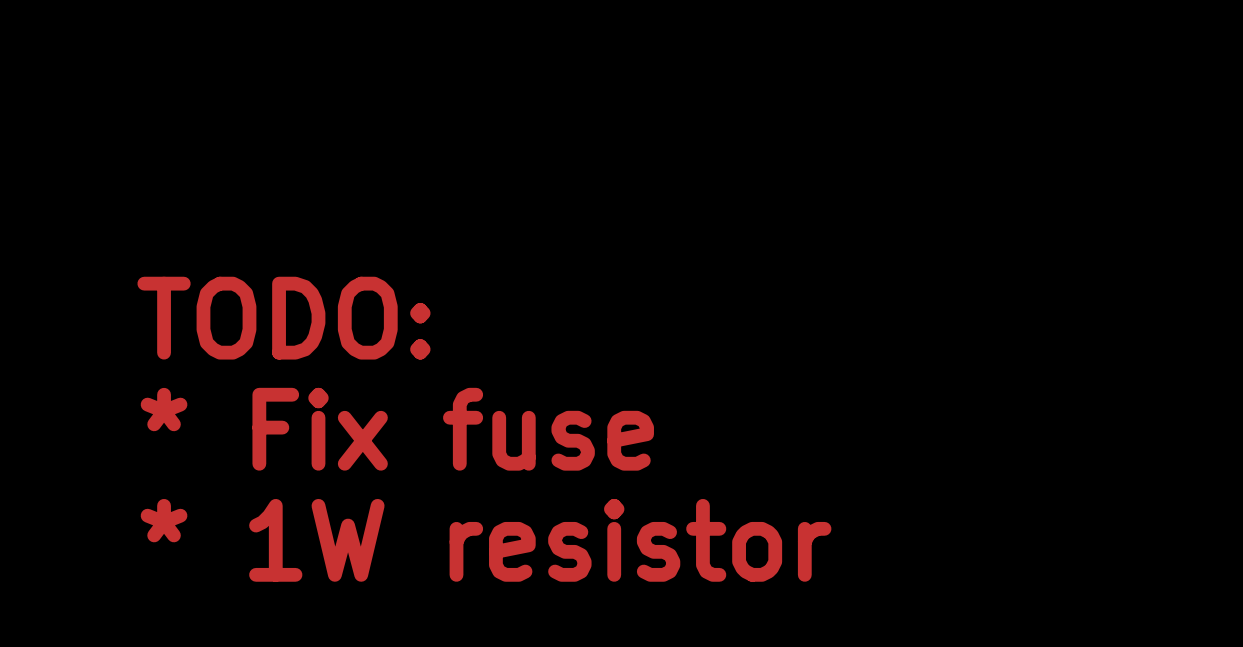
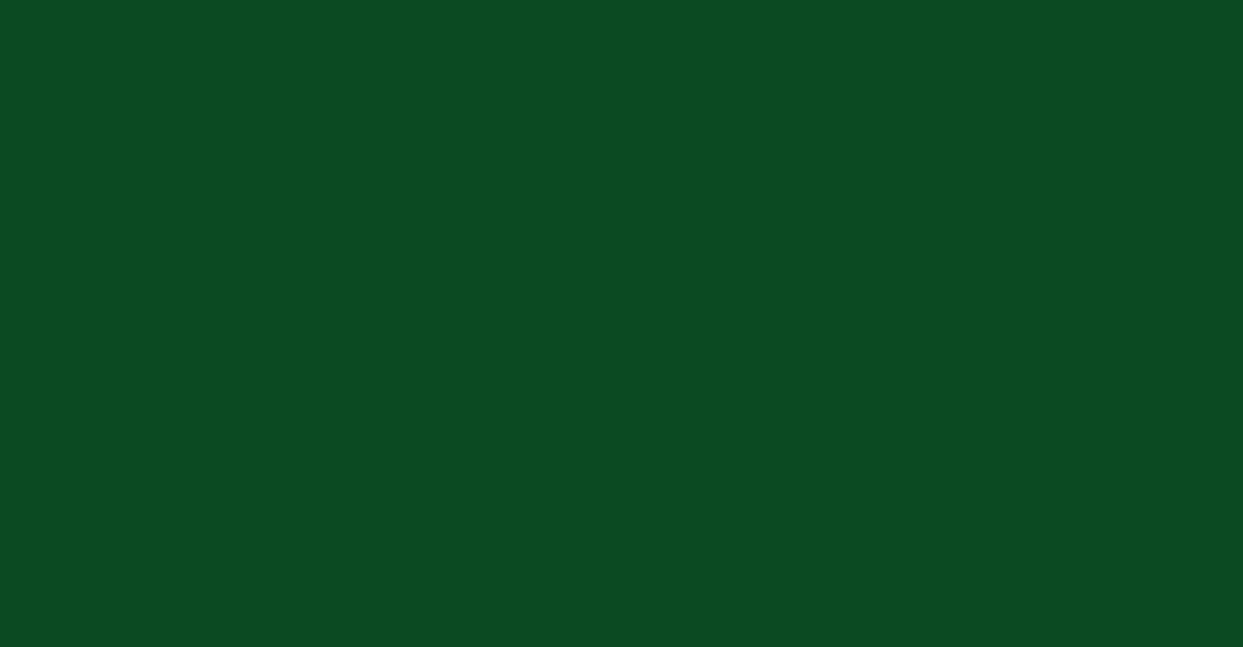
text: TODO: (283, 318) -> none
text: * Fix fuse (397, 429) -> none
text: * 1W resistor (486, 540) -> none

